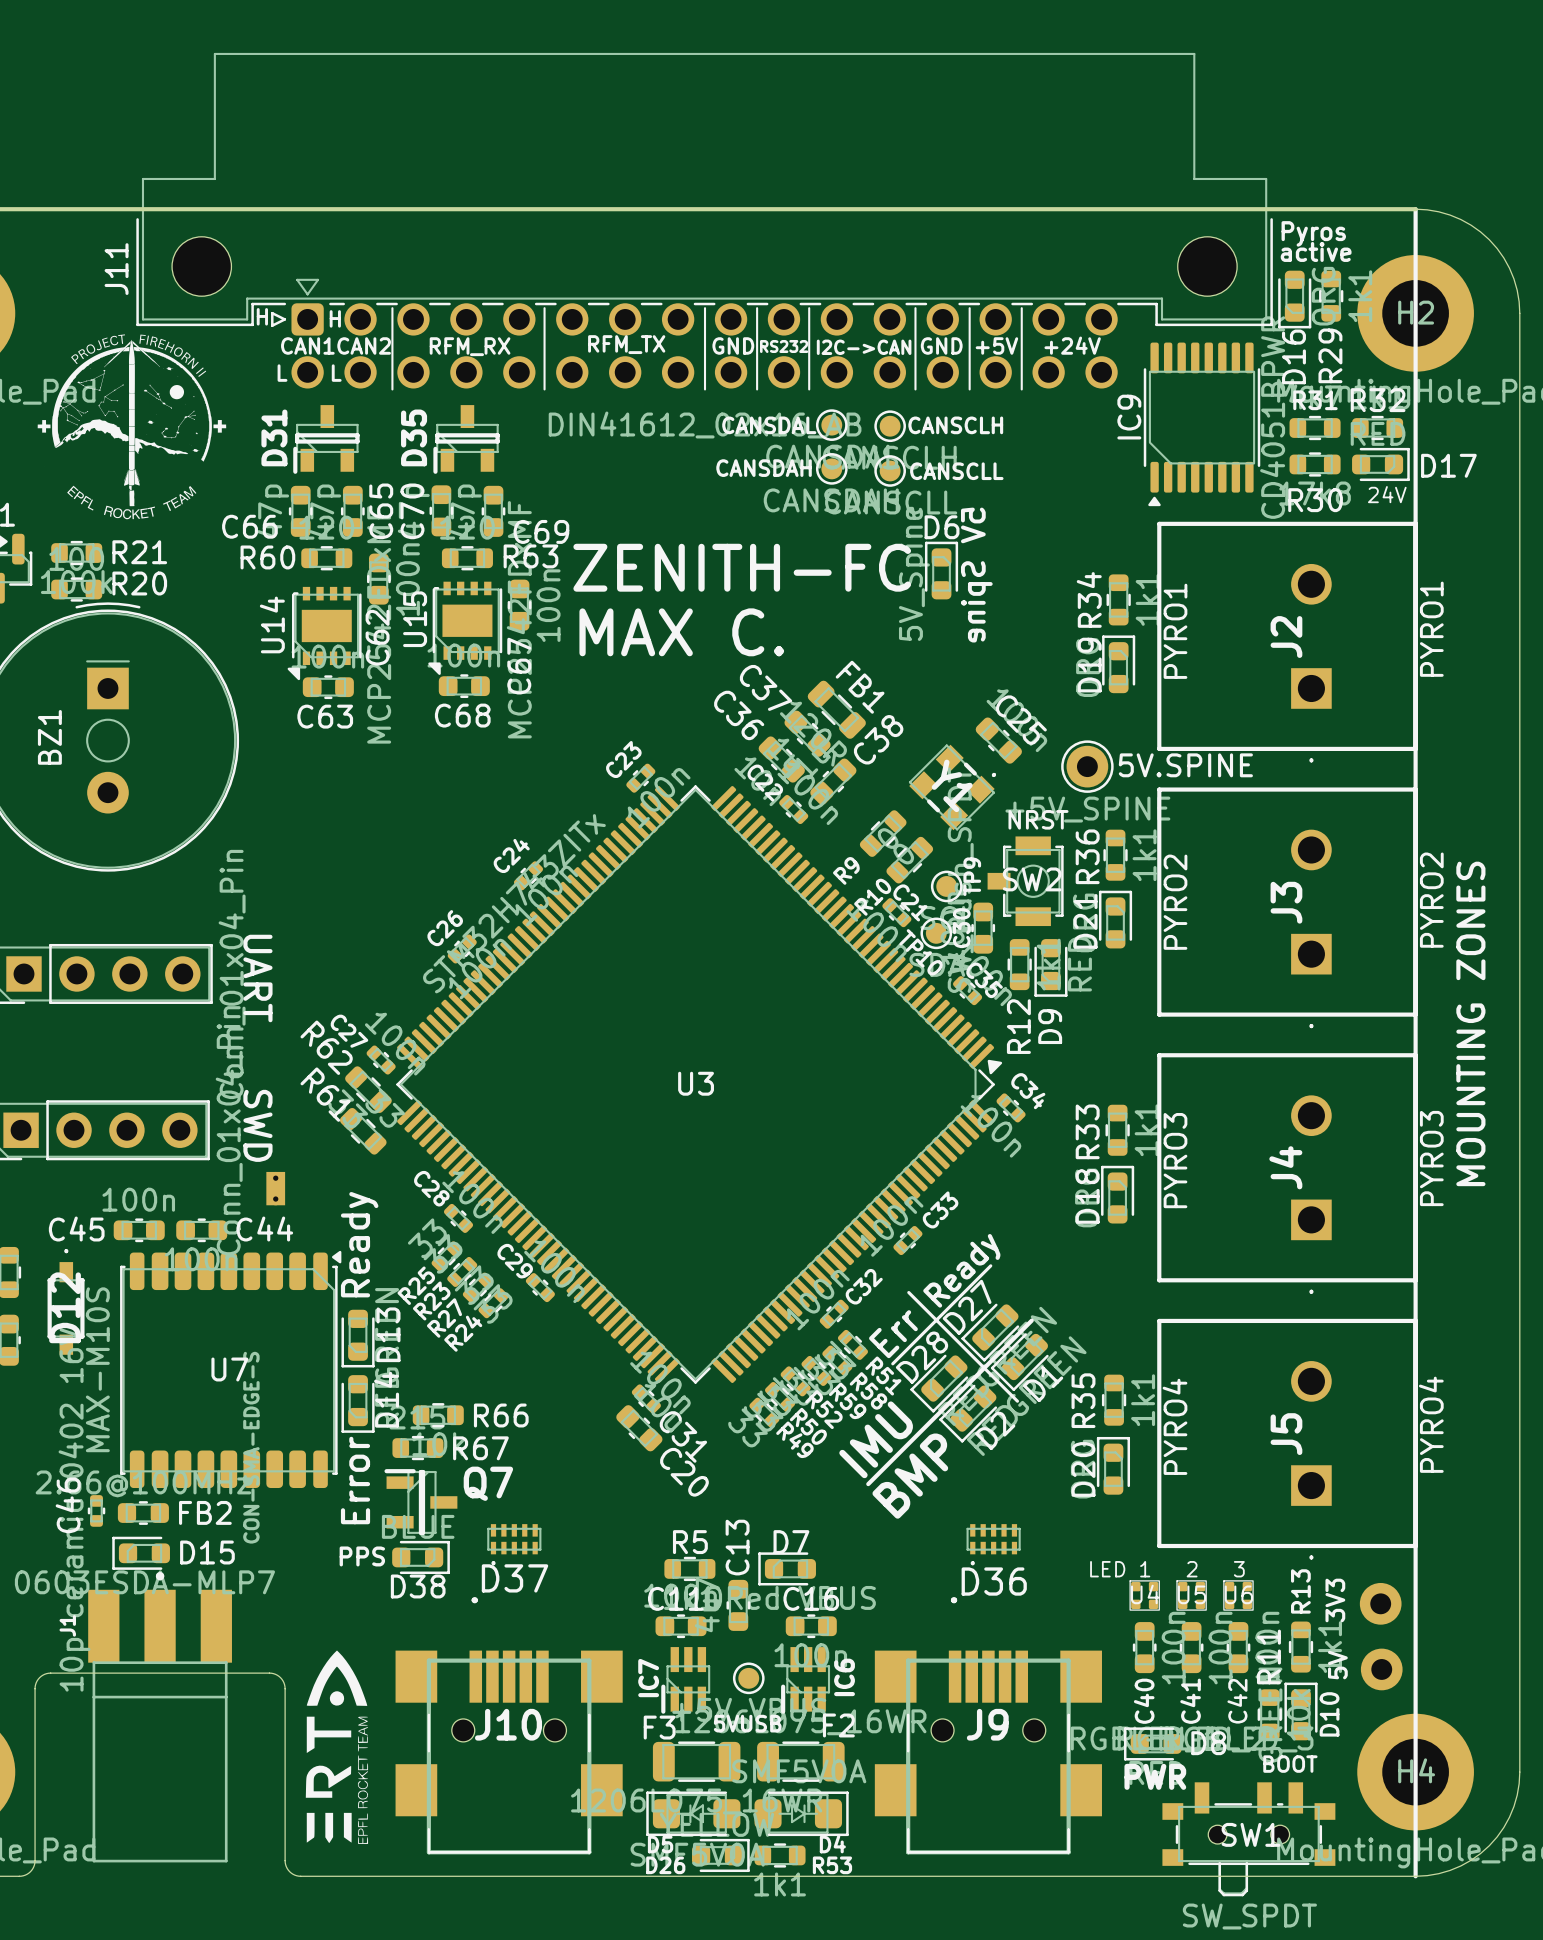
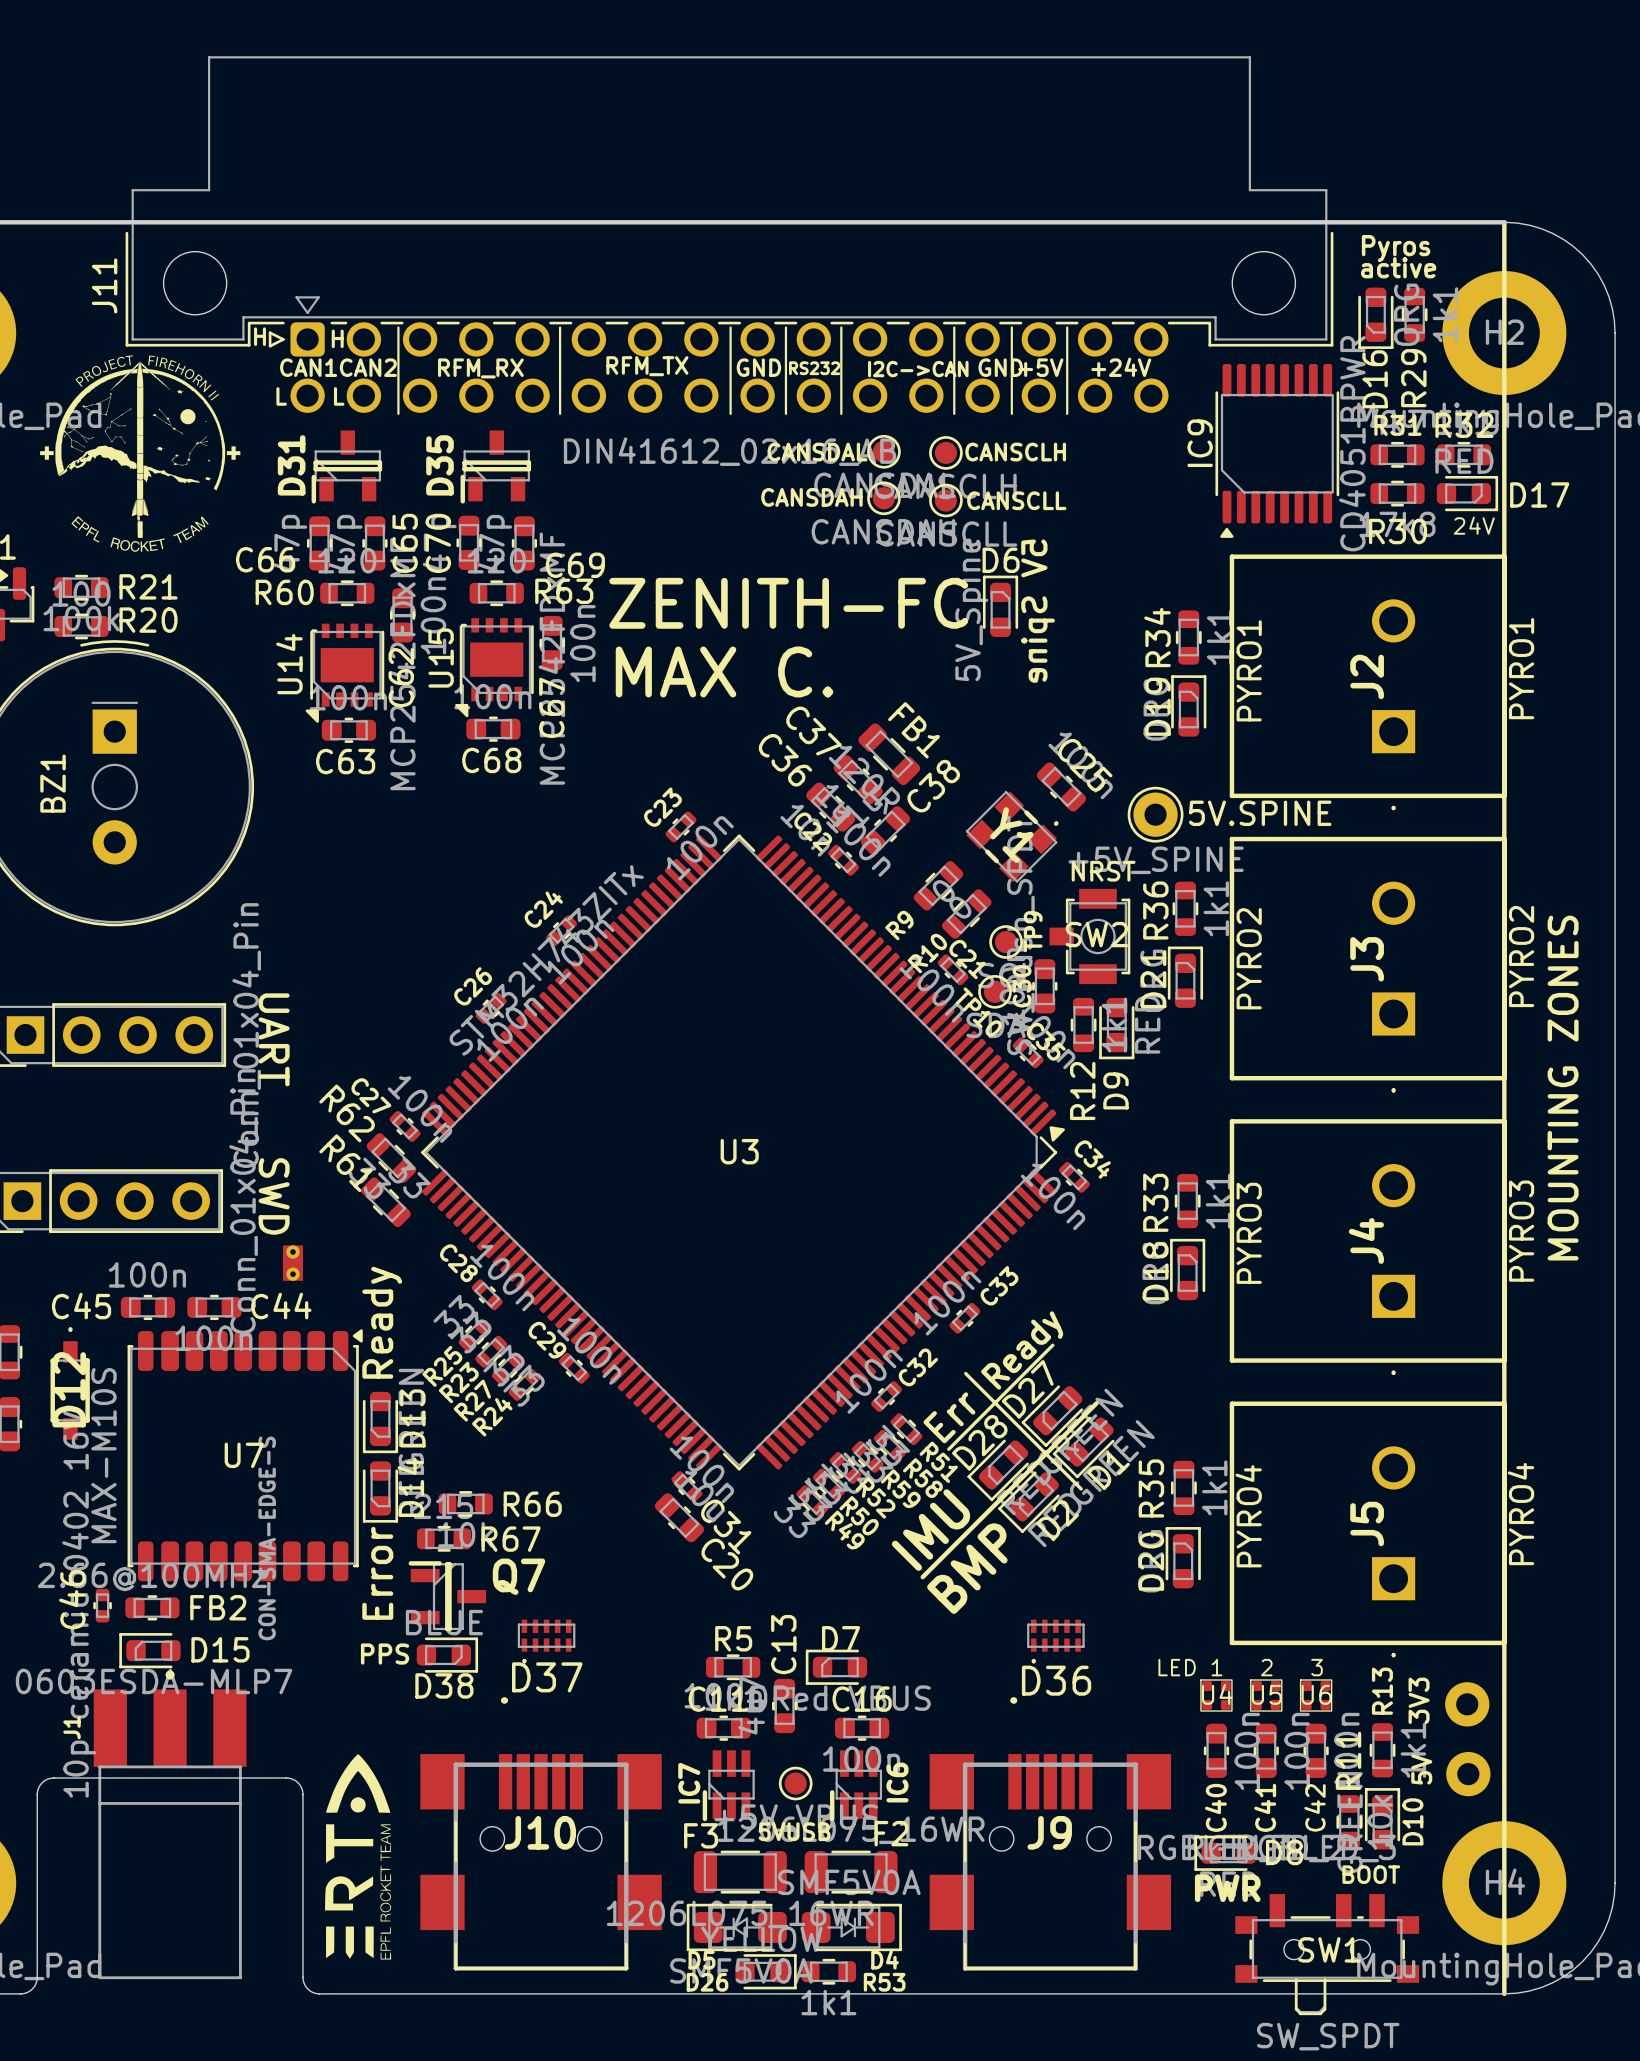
J11 position: (704, 220) -> (729, 234)
line: (392, 308) (392, 389) -> (398, 327) (398, 413)
line: (544, 308) (544, 389) -> (560, 327) (560, 413)
line: (705, 308) (705, 389) -> (730, 327) (730, 413)
line: (757, 308) (757, 389) -> (785, 327) (785, 413)
line: (809, 308) (809, 389) -> (841, 327) (841, 413)
line: (915, 308) (915, 389) -> (954, 327) (954, 413)
line: (969, 308) (969, 389) -> (1011, 327) (1011, 413)
line: (1021, 308) (1021, 389) -> (1067, 327) (1067, 413)
text position: H (262, 316) -> H (259, 336)
text position: H (335, 318) -> H (337, 338)
text position: RFM_TX (626, 344) -> RFM_TX (647, 366)
text position: CAN1 (307, 345) -> CAN1 (308, 367)
text position: CAN2 (364, 345) -> CAN2 (368, 367)
text position: GND (733, 345) -> GND (758, 367)
text position: +5V (996, 345) -> +5V (1040, 367)
text position: +24V (1072, 345) -> +24V (1121, 367)
text position: RFM_RX (470, 346) -> RFM_RX (480, 368)
text position: RS232 (784, 346) -> RS232 (814, 368)
text position: L (282, 373) -> L (281, 396)
text position: L (336, 373) -> L (339, 396)

